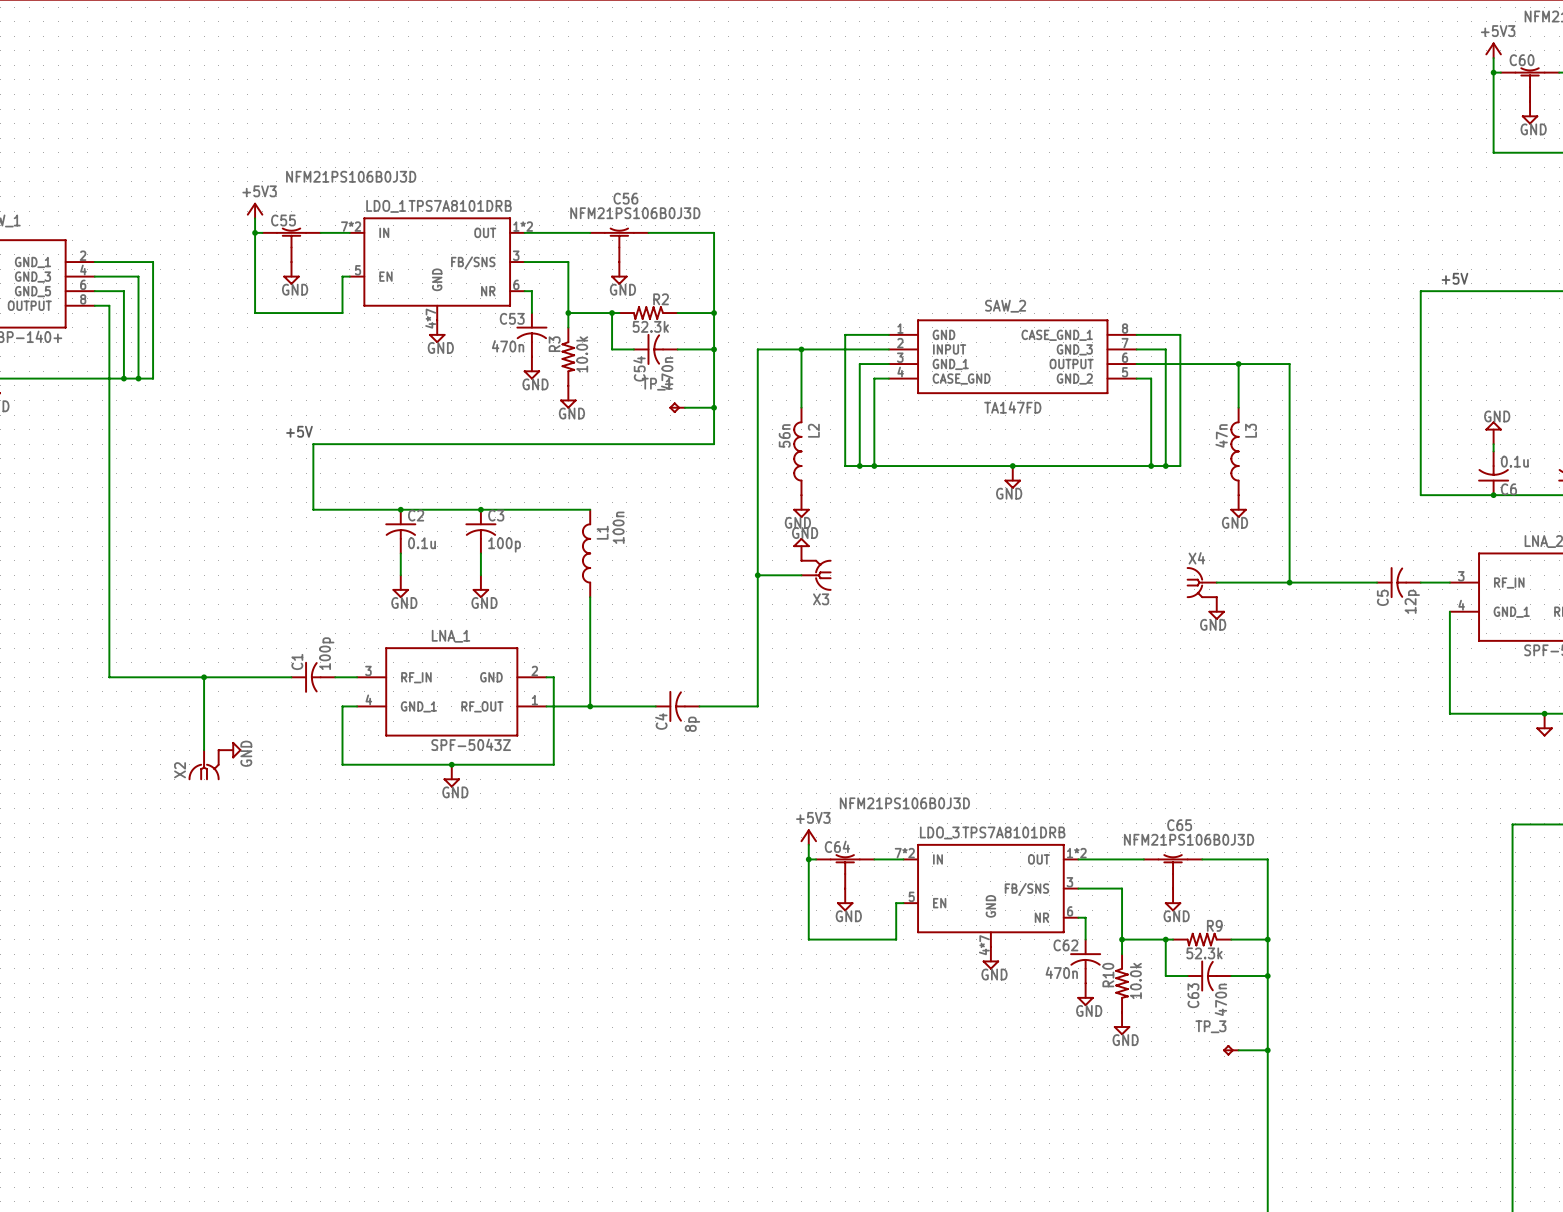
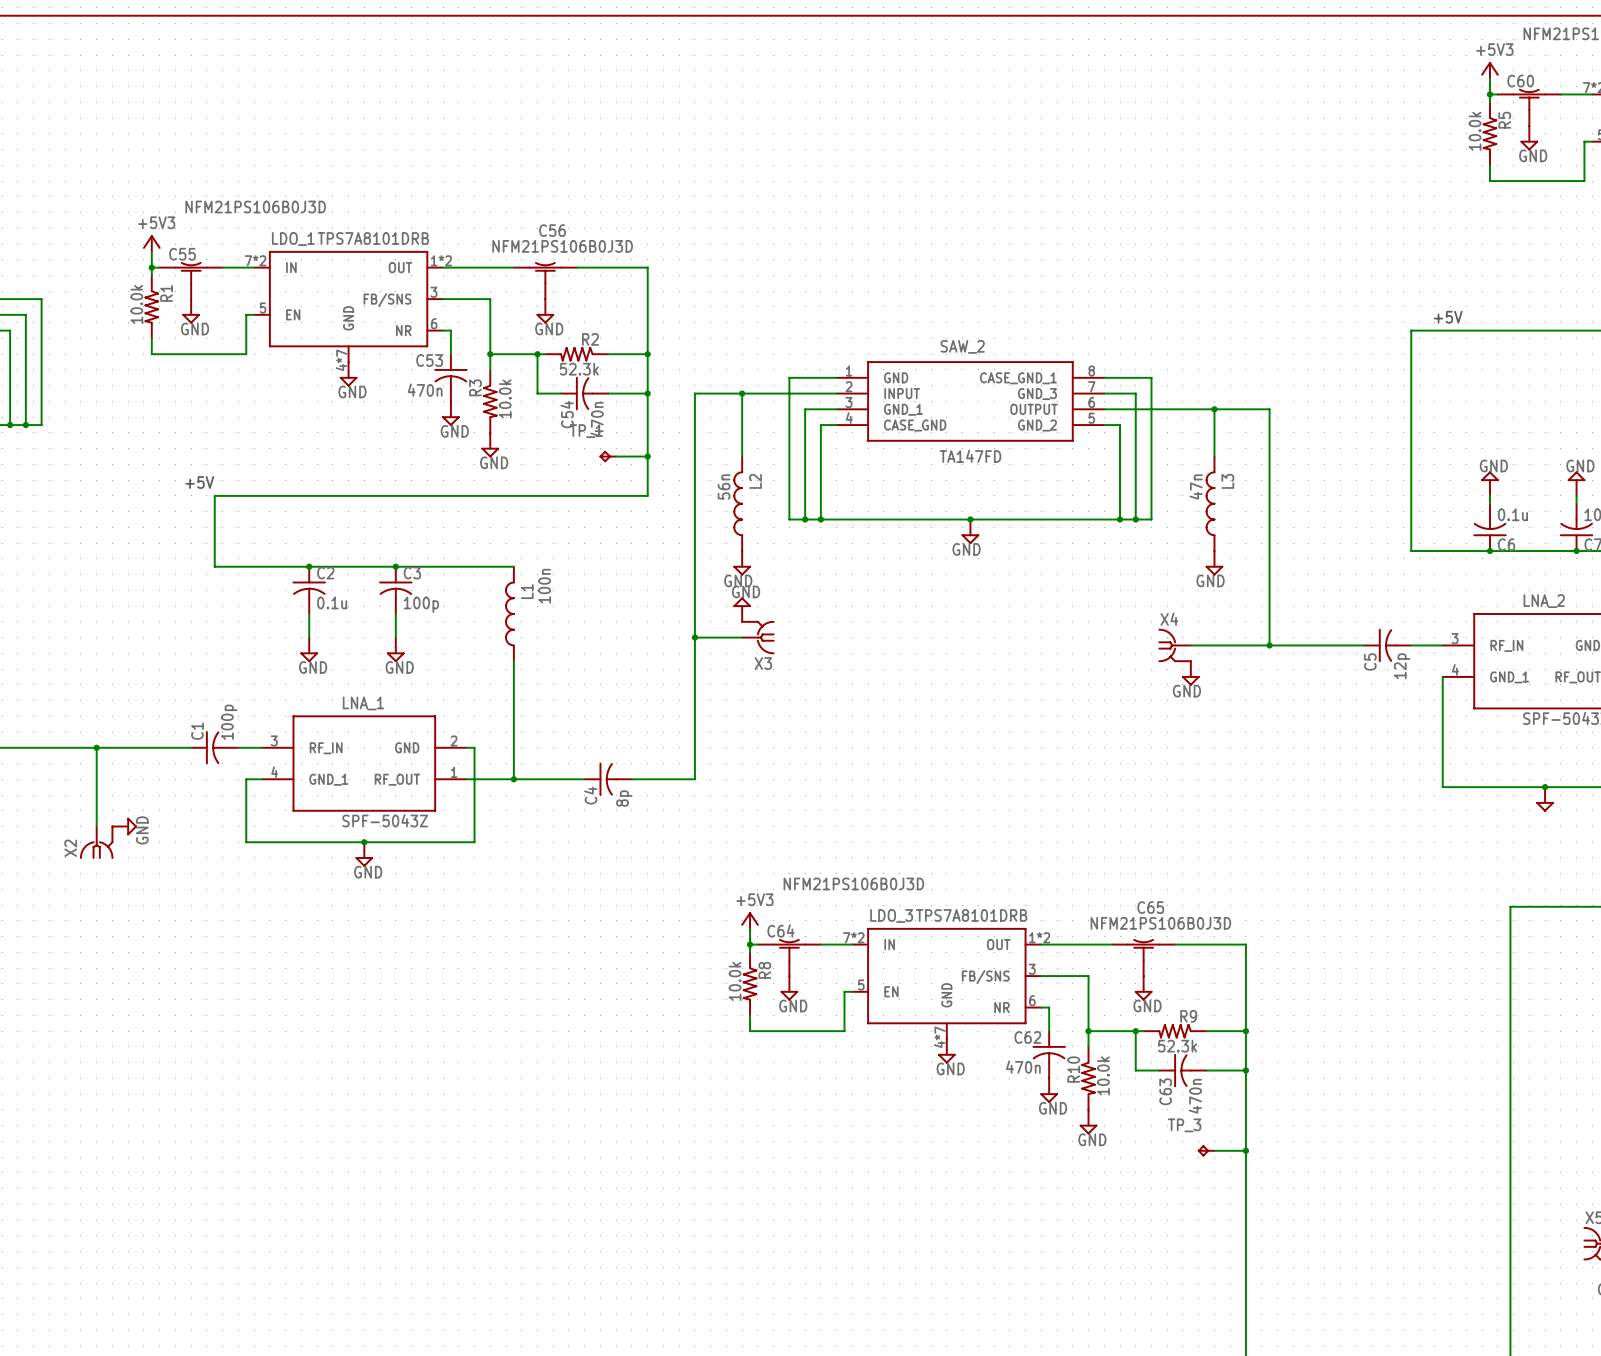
R5: none -> 10.0k (1489, 133)
R1: none -> 10.0k (151, 306)
R8: none -> 10.0k (750, 983)

